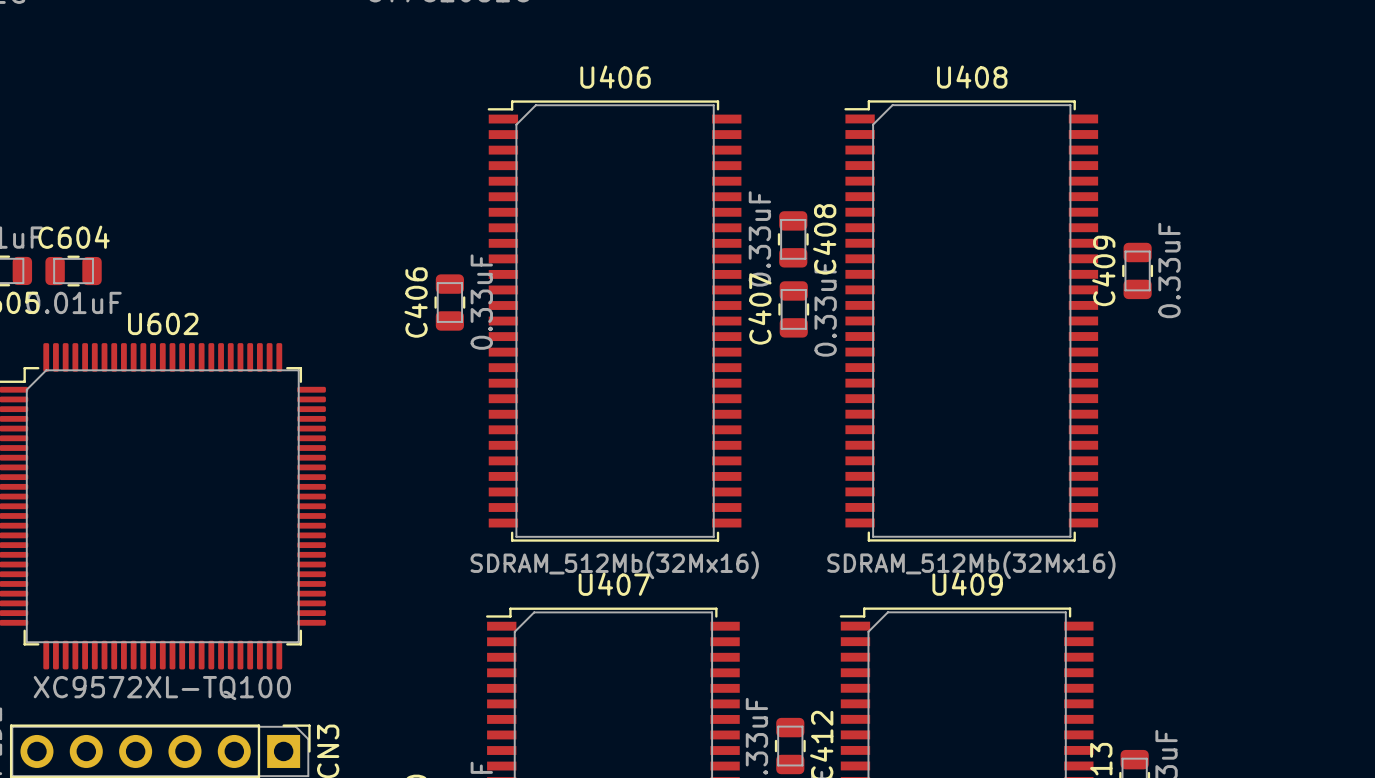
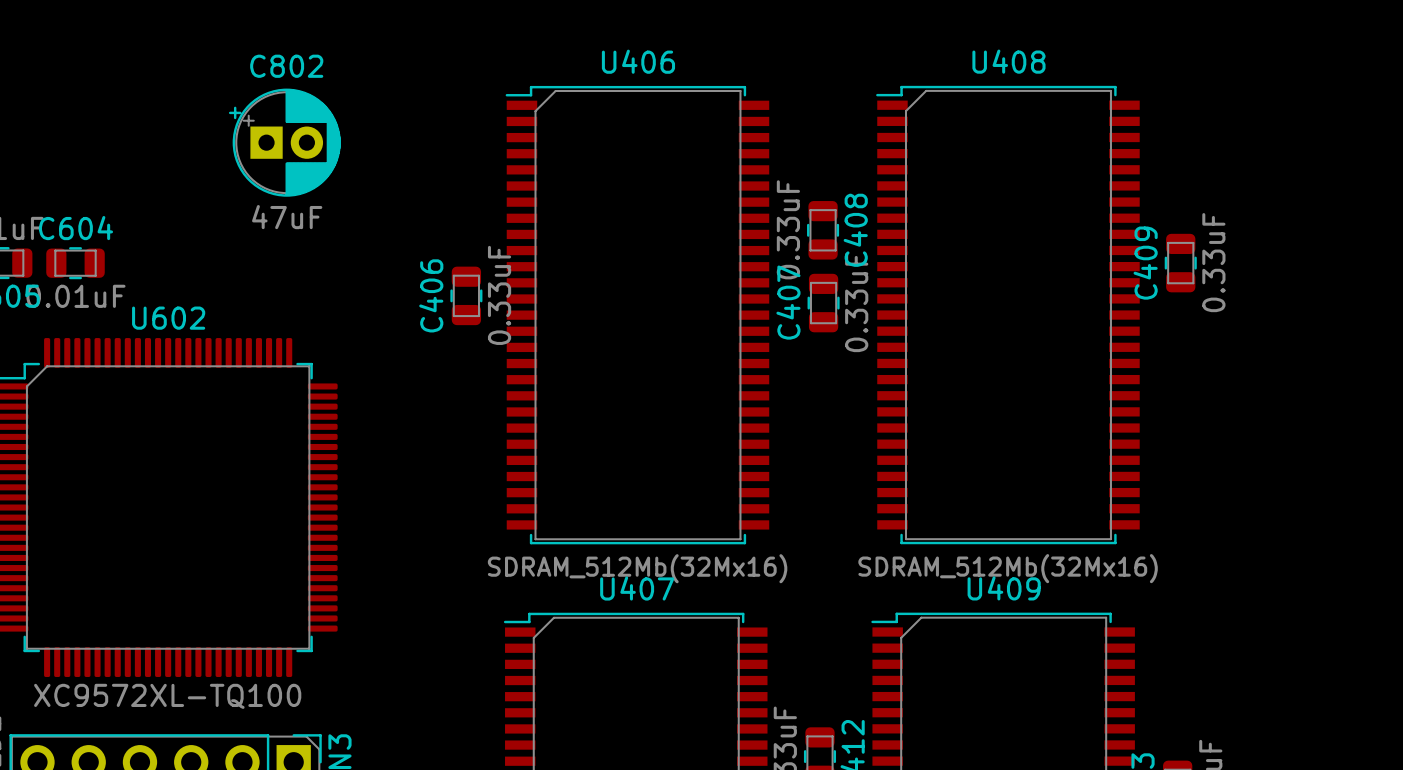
C802: none -> 47uF (284, 142)

